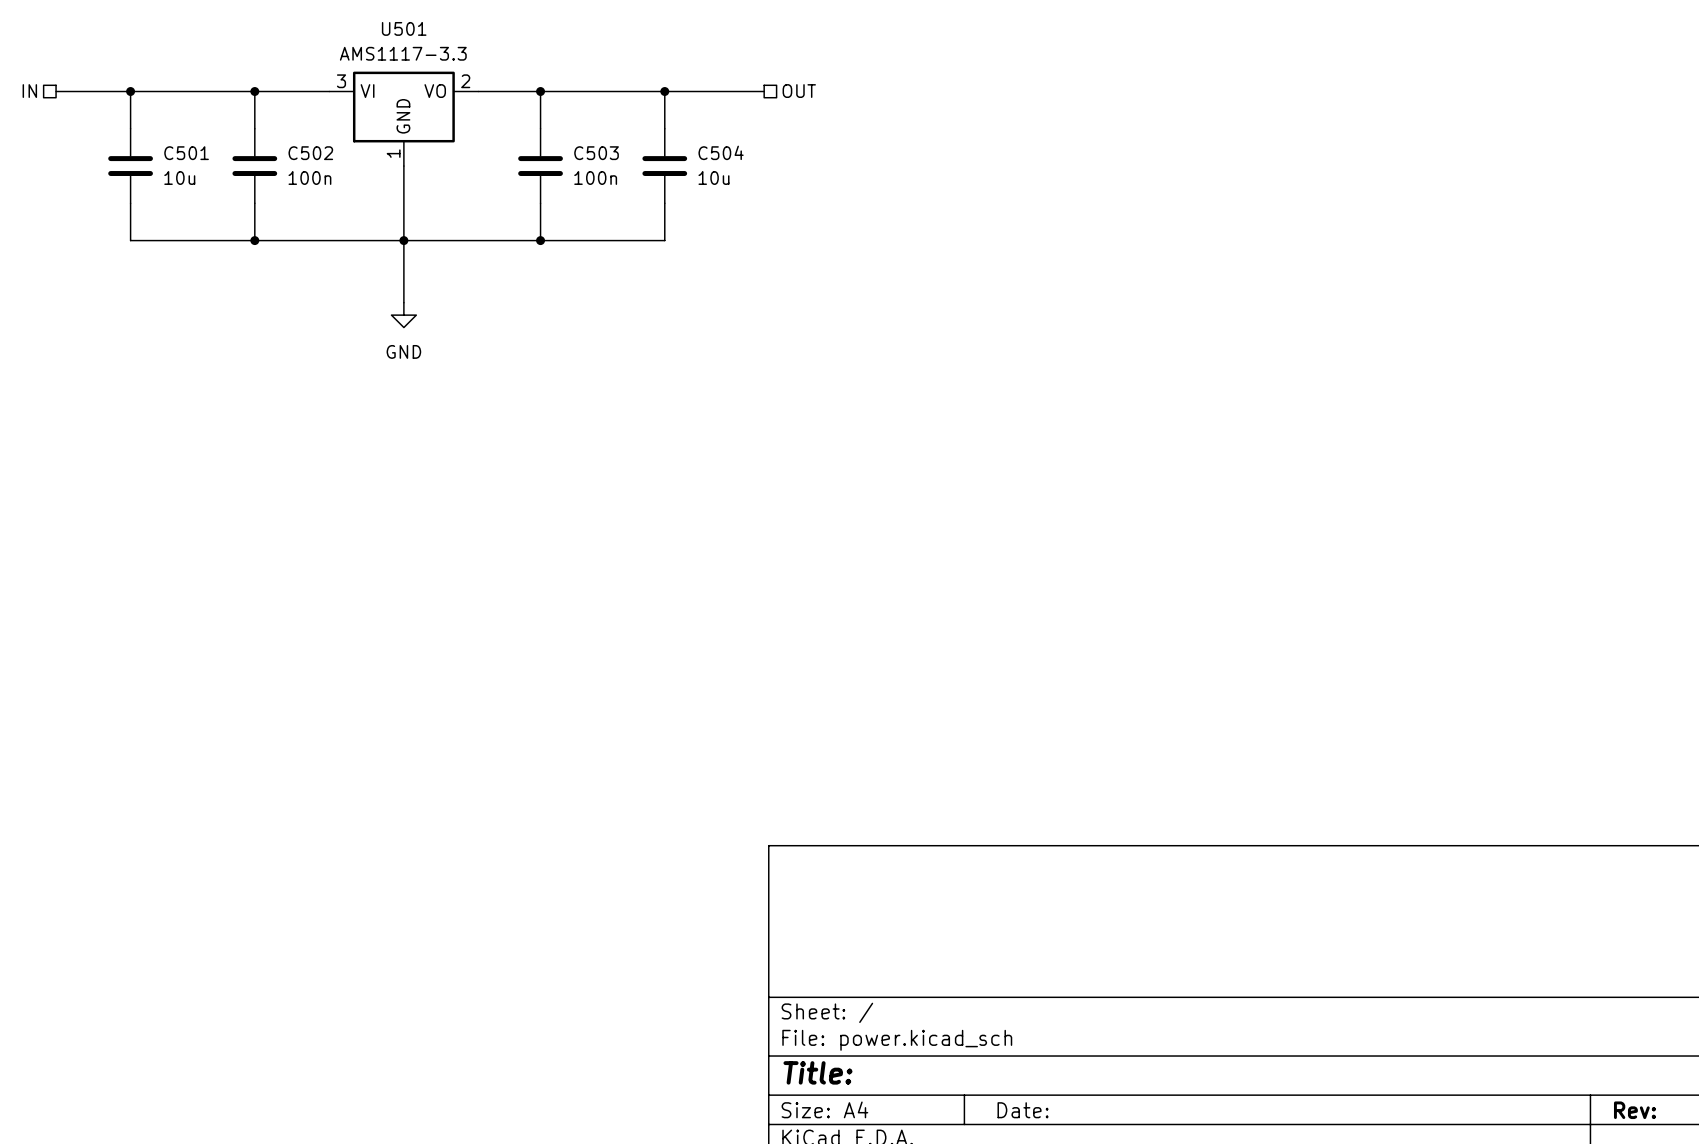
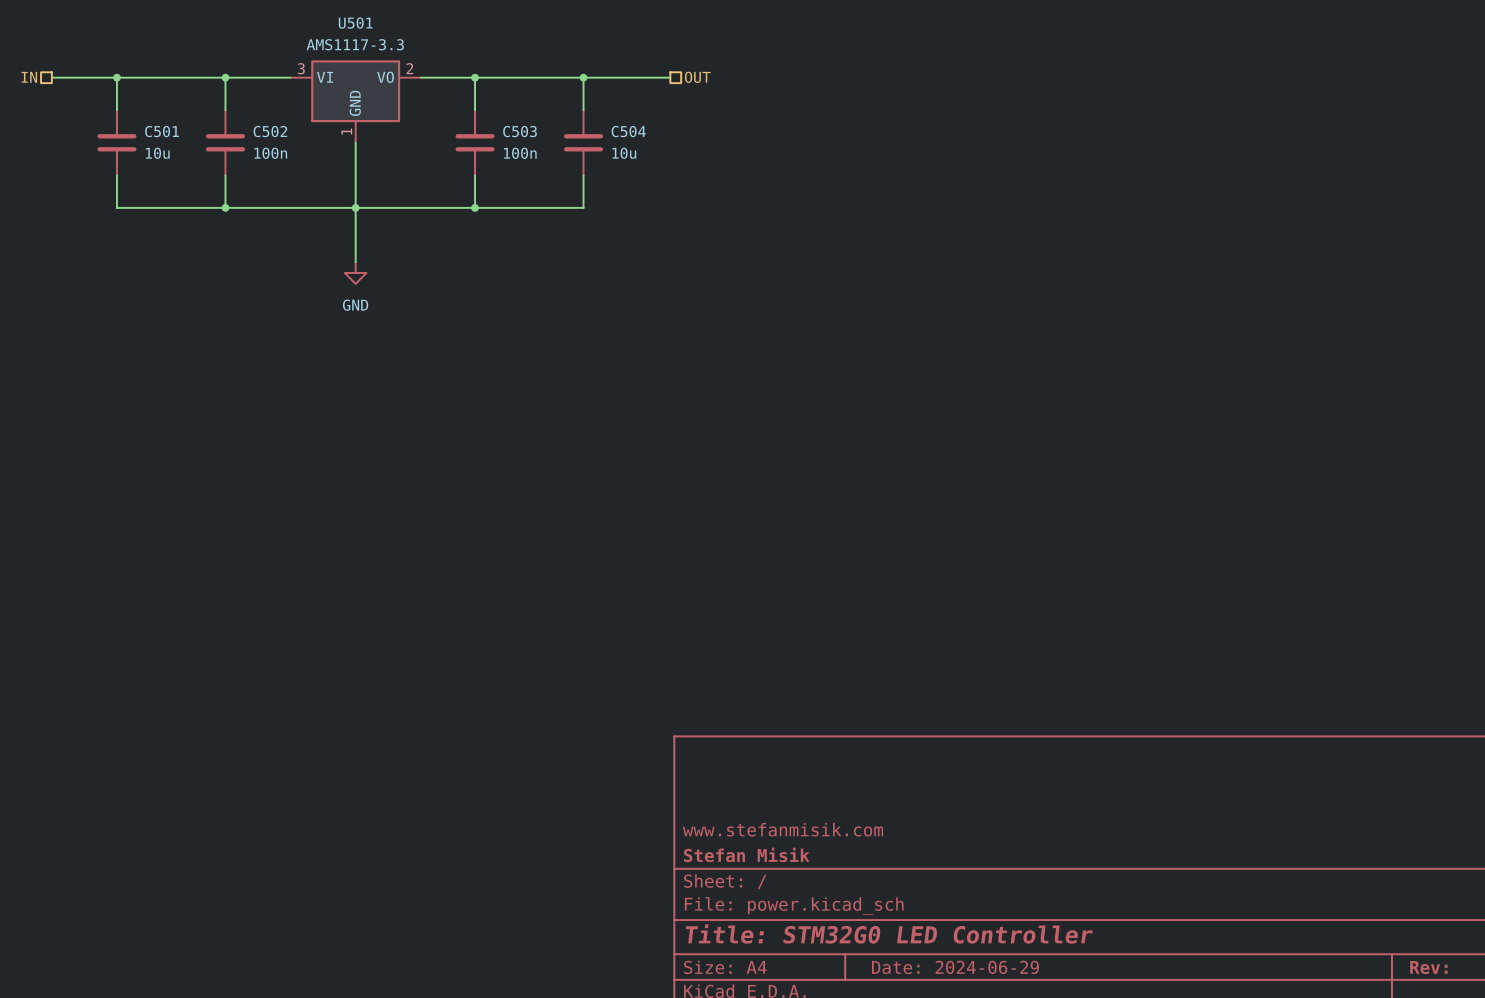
title block: none -> www.stefanmisik.com (782, 829)
title block: none -> Stefan Misik (746, 854)
title block: Title: (817, 1072) -> Title: STM32G0 LED Controller (889, 933)
title block: Date: (1023, 1110) -> Date: 2024-06-29 (955, 967)

